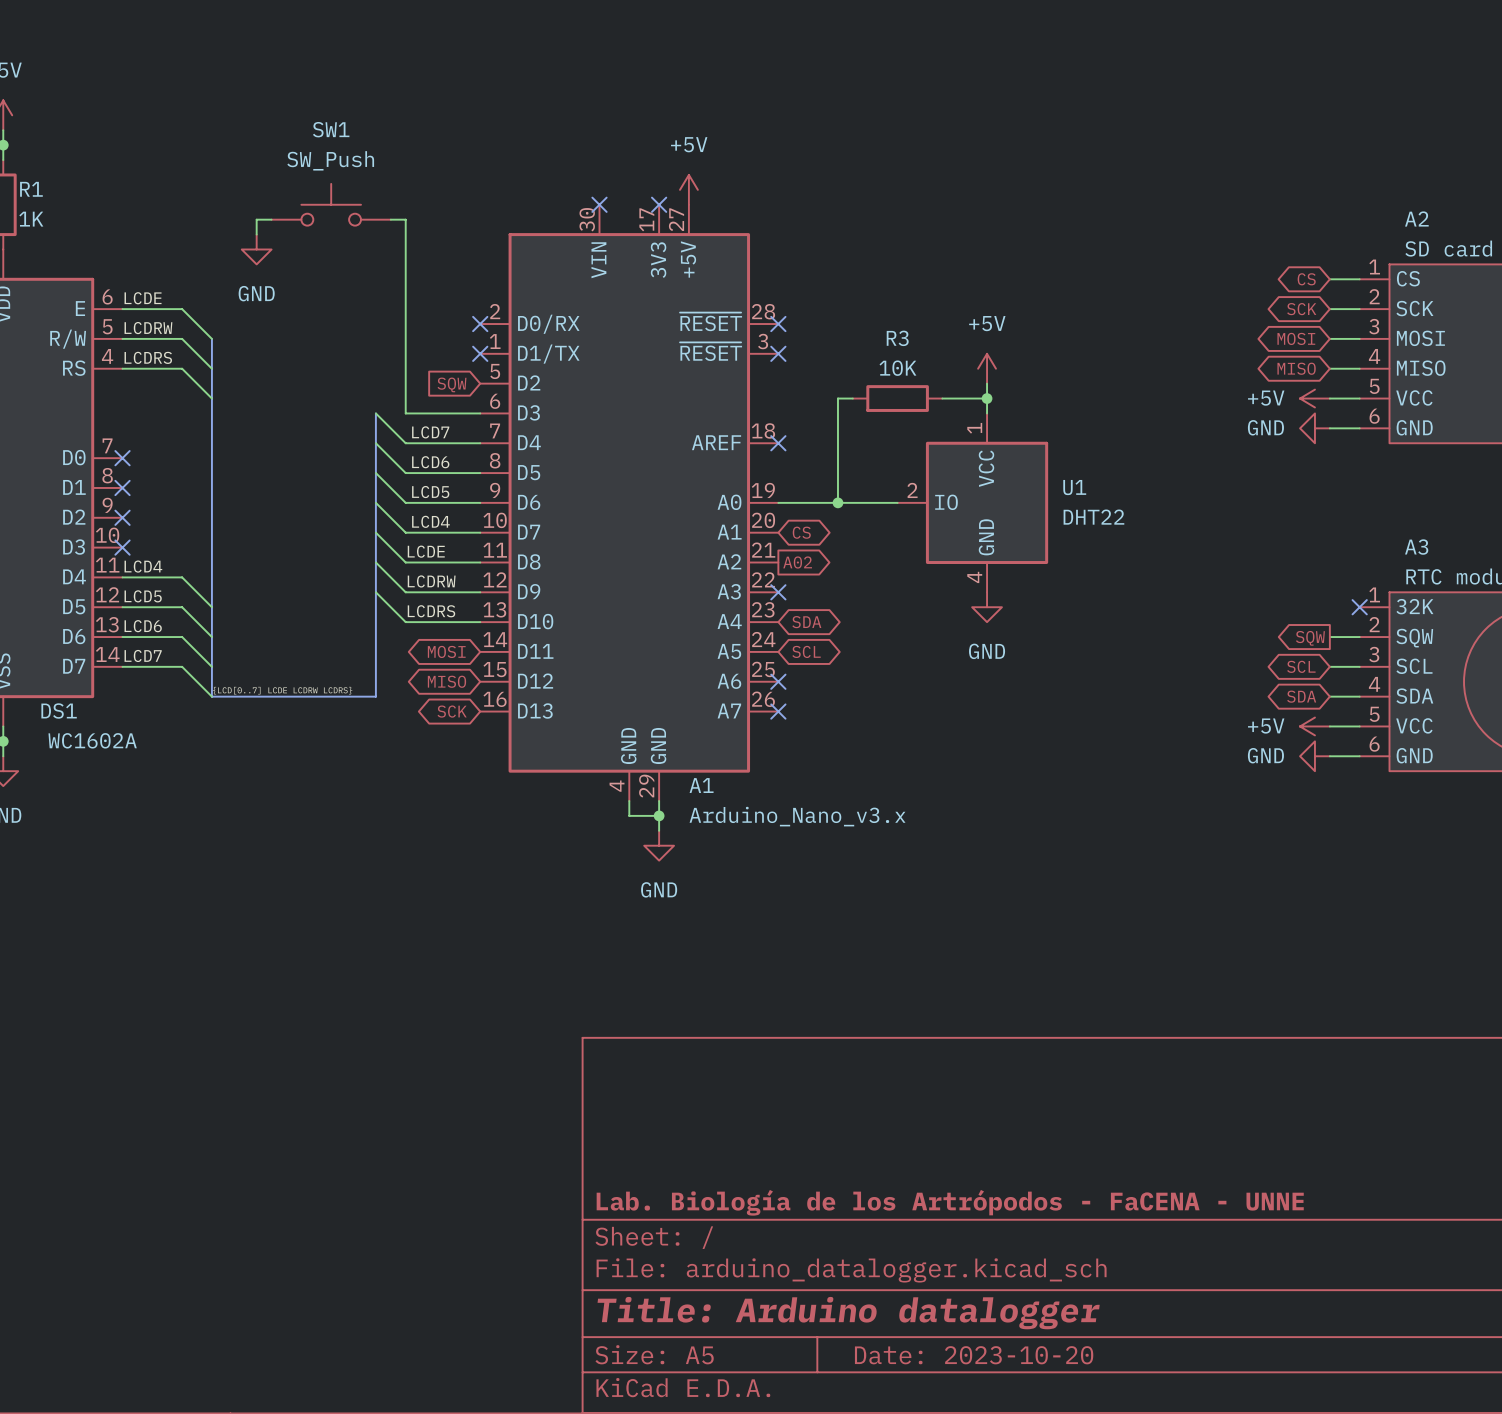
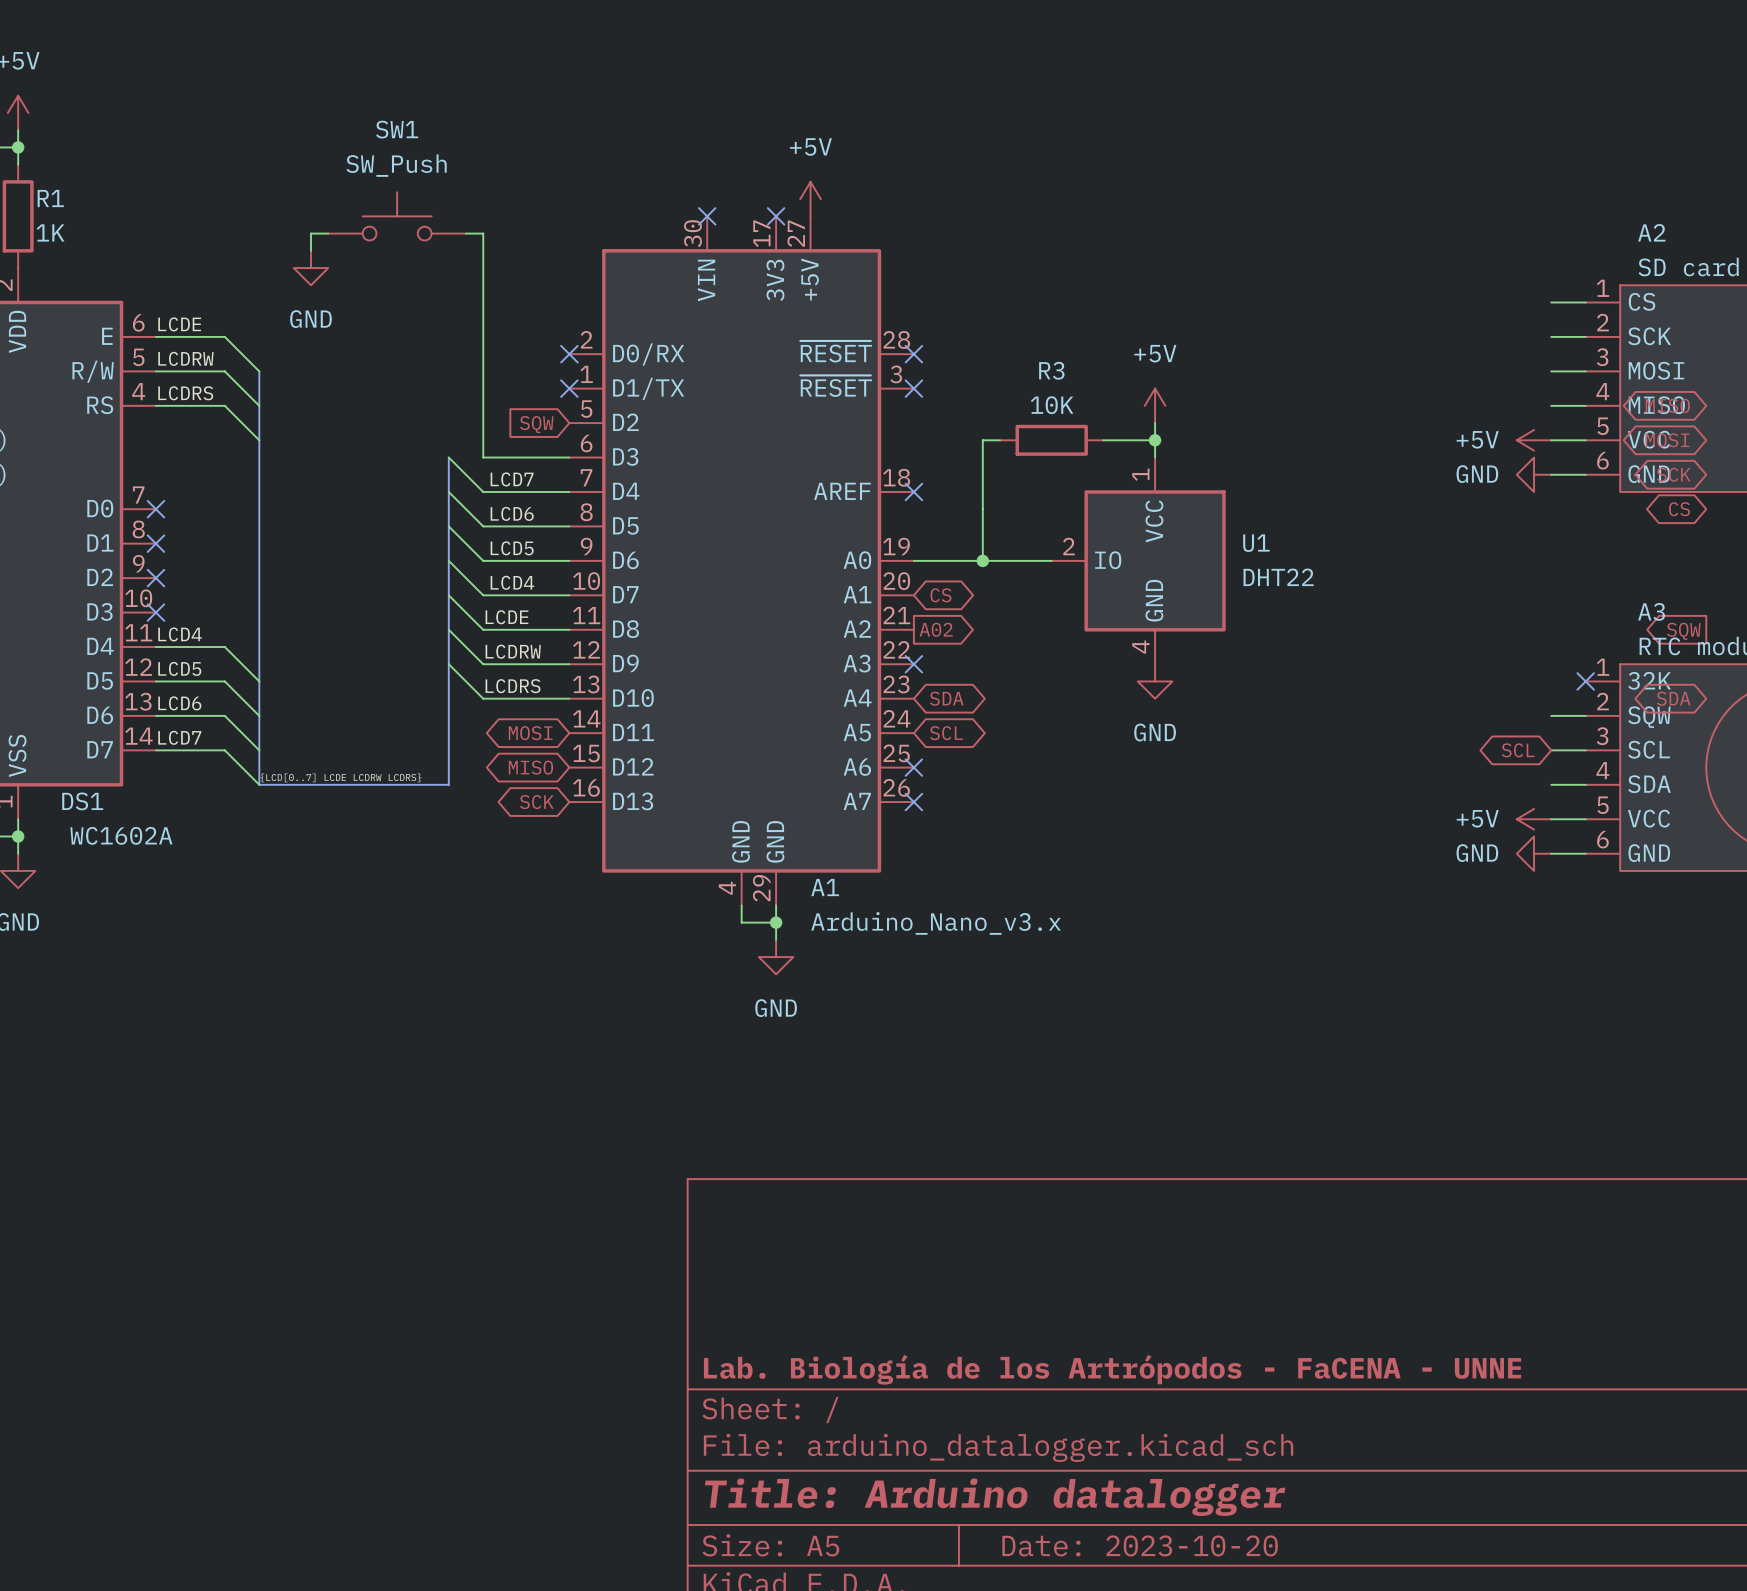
global label position: CS (1306, 279) -> CS (1679, 509)
global label position: SCK (1301, 309) -> SCK (1673, 474)
global label position: MOSI (1296, 338) -> MOSI (1667, 440)
global label position: MISO (1296, 368) -> MISO (1667, 405)
global label position: SQW (1310, 638) -> SQW (1683, 631)
global label position: SDA (1301, 696) -> SDA (1673, 698)

